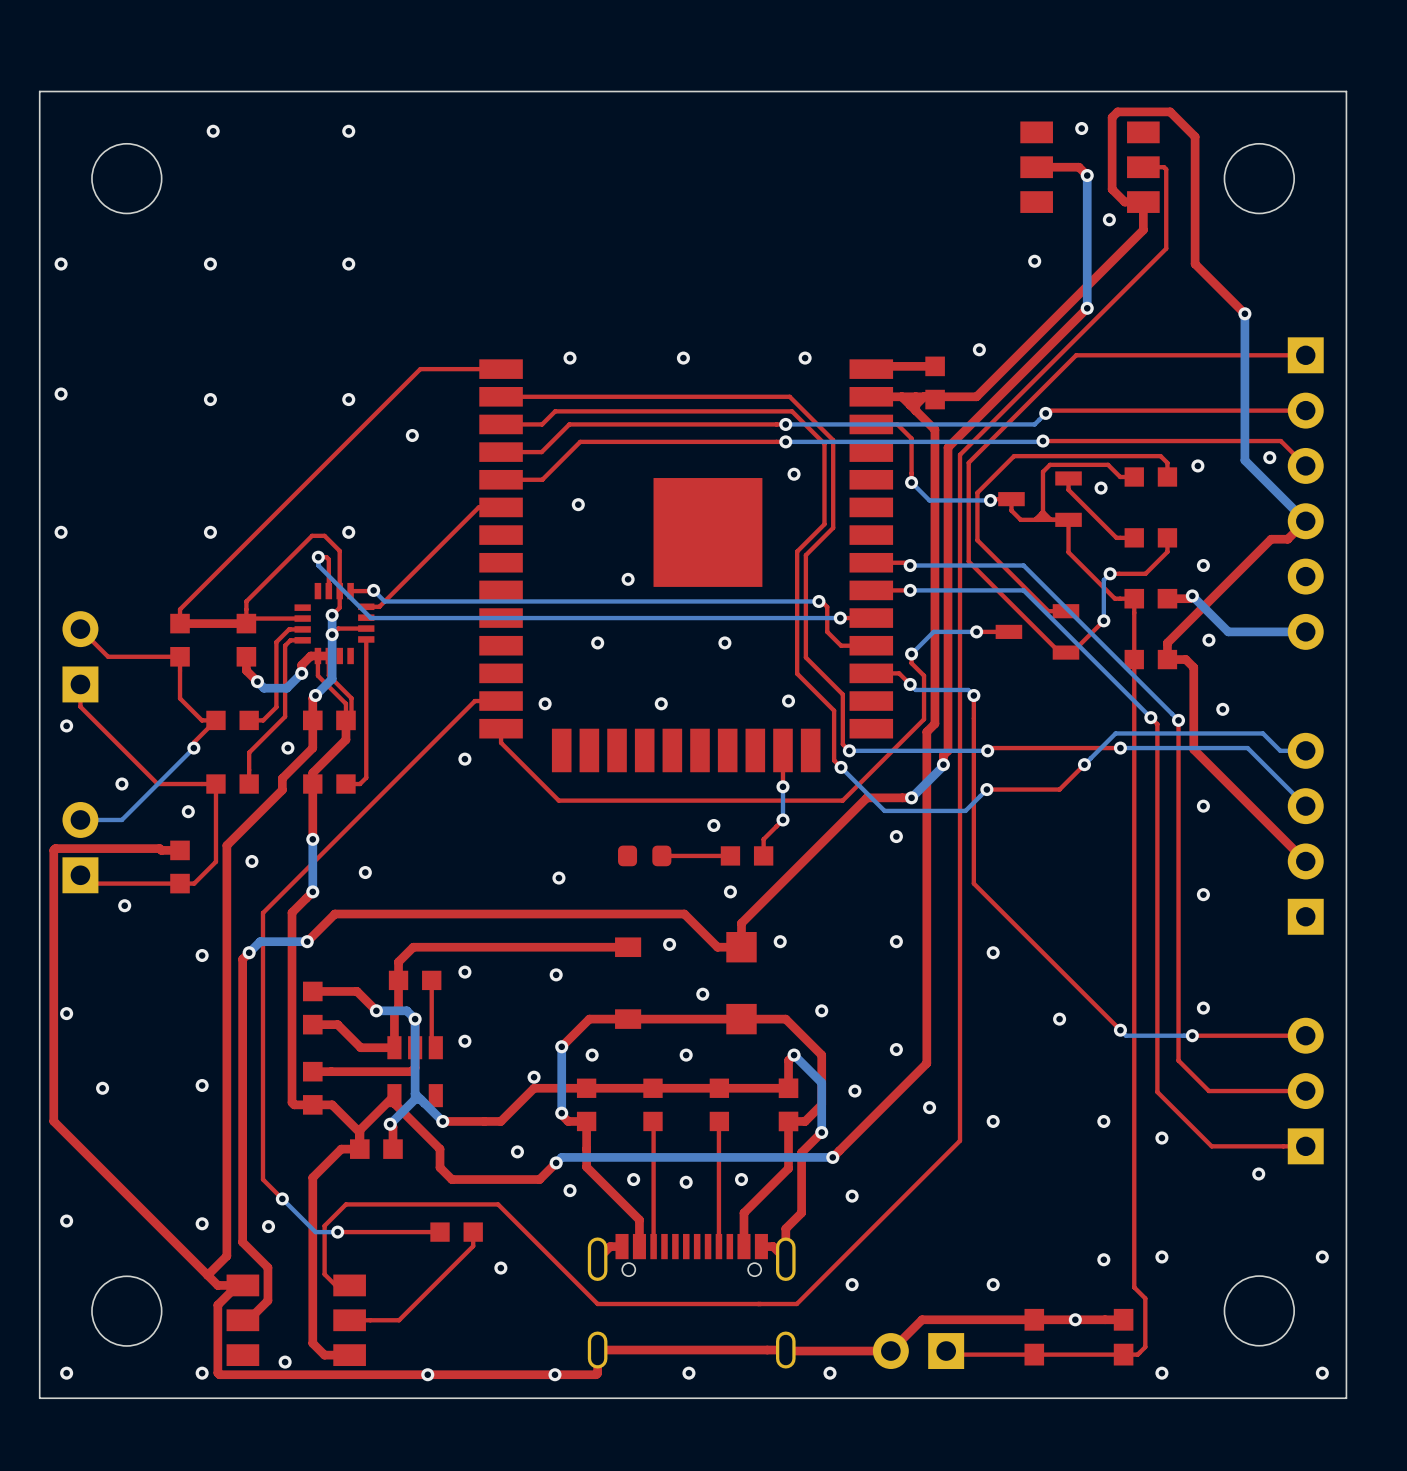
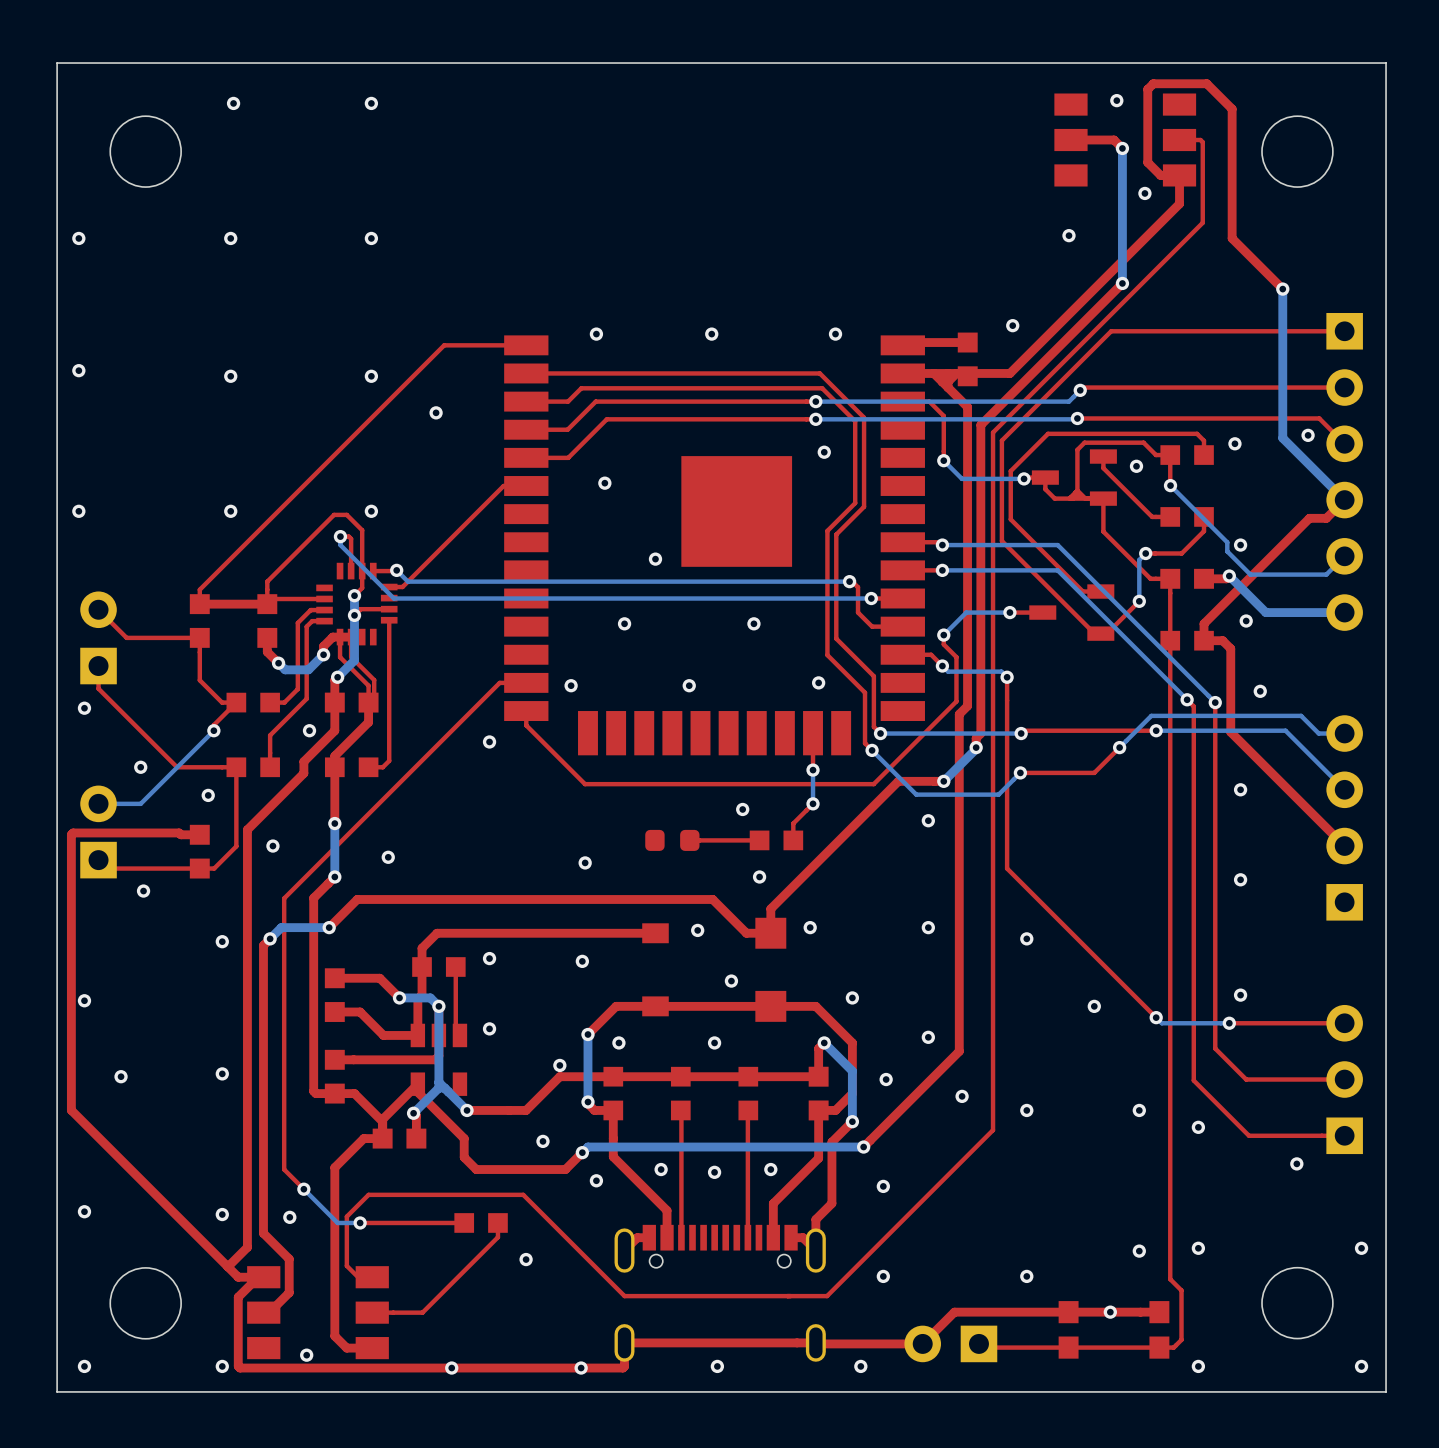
top track: none -> (1170, 463) (1170, 485)
bottom track: none -> (1170, 485) (1227, 542) (1227, 551) (1250, 574) (1326, 574) (1344, 556)
via: none -> (1170, 485)

